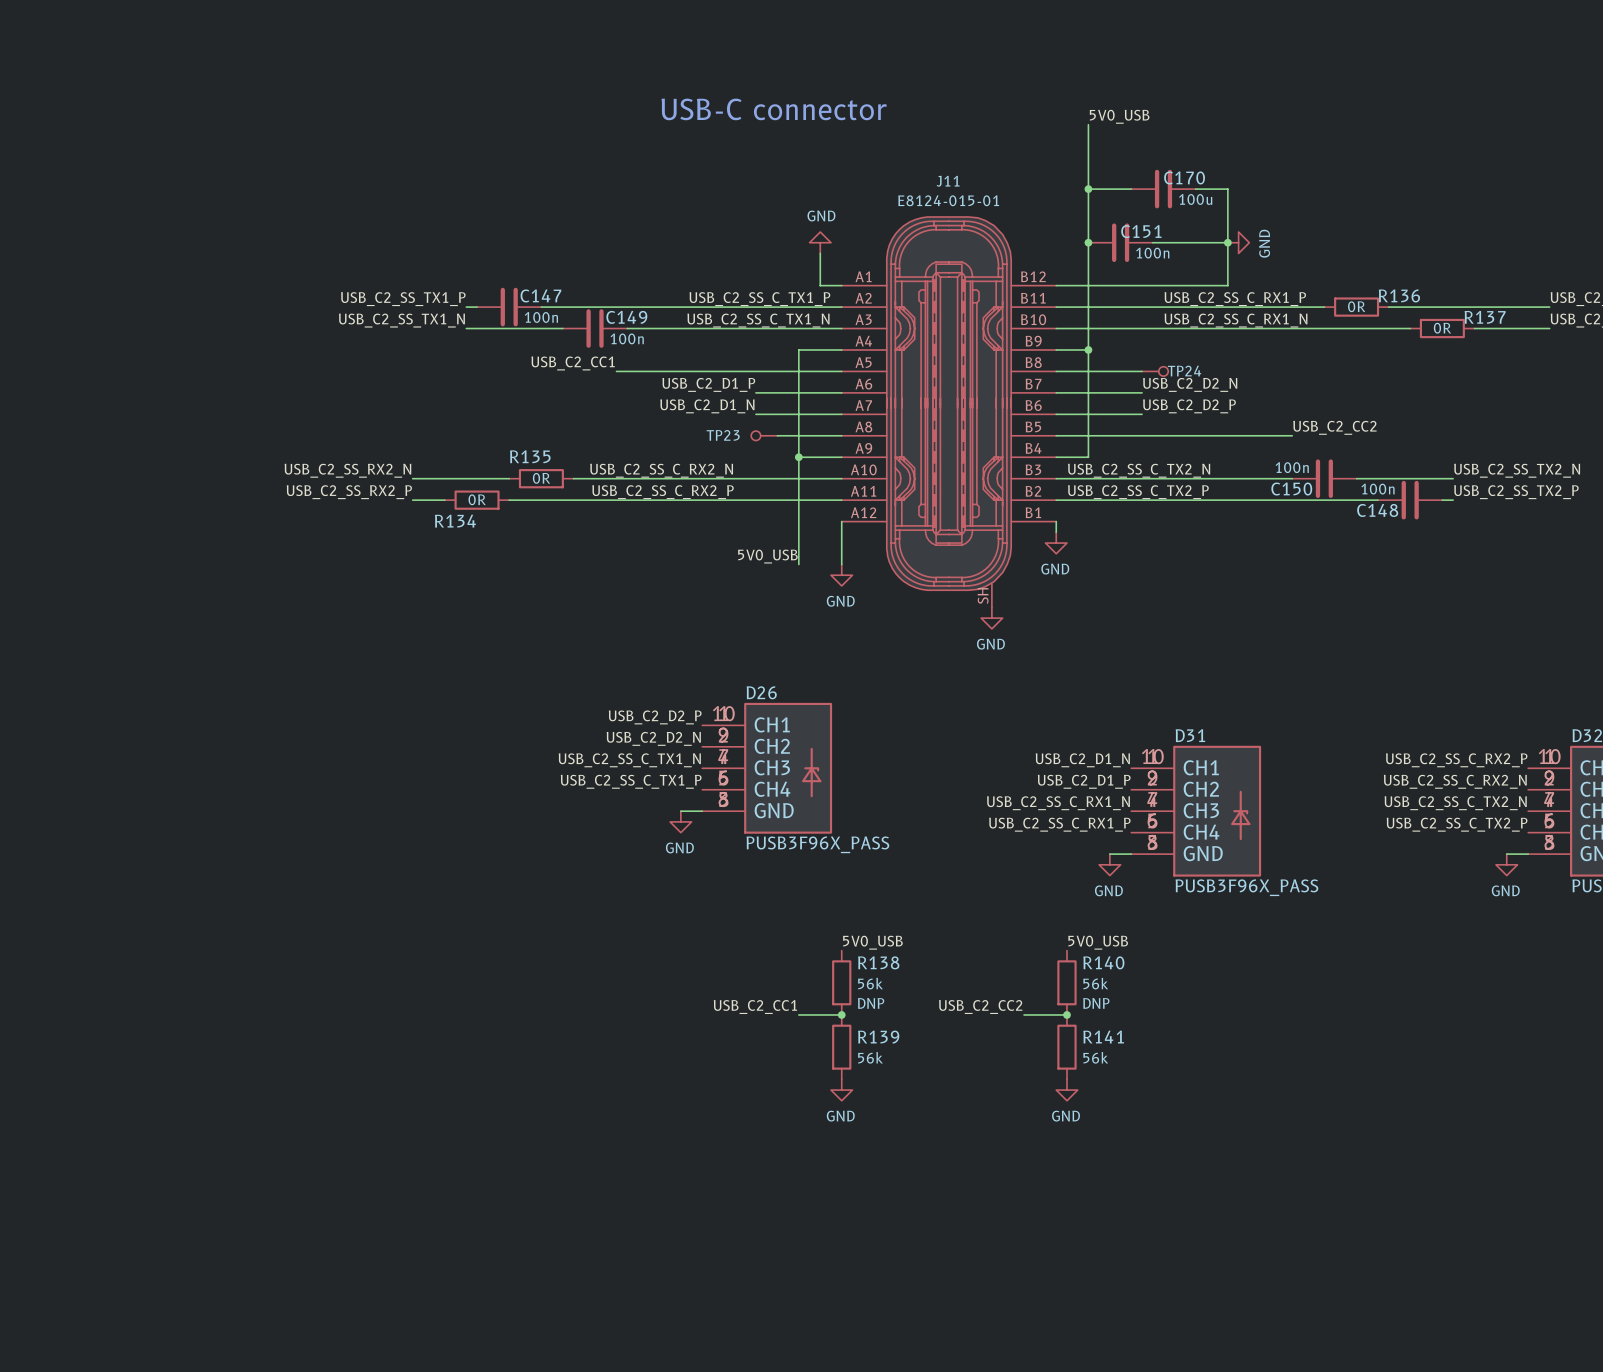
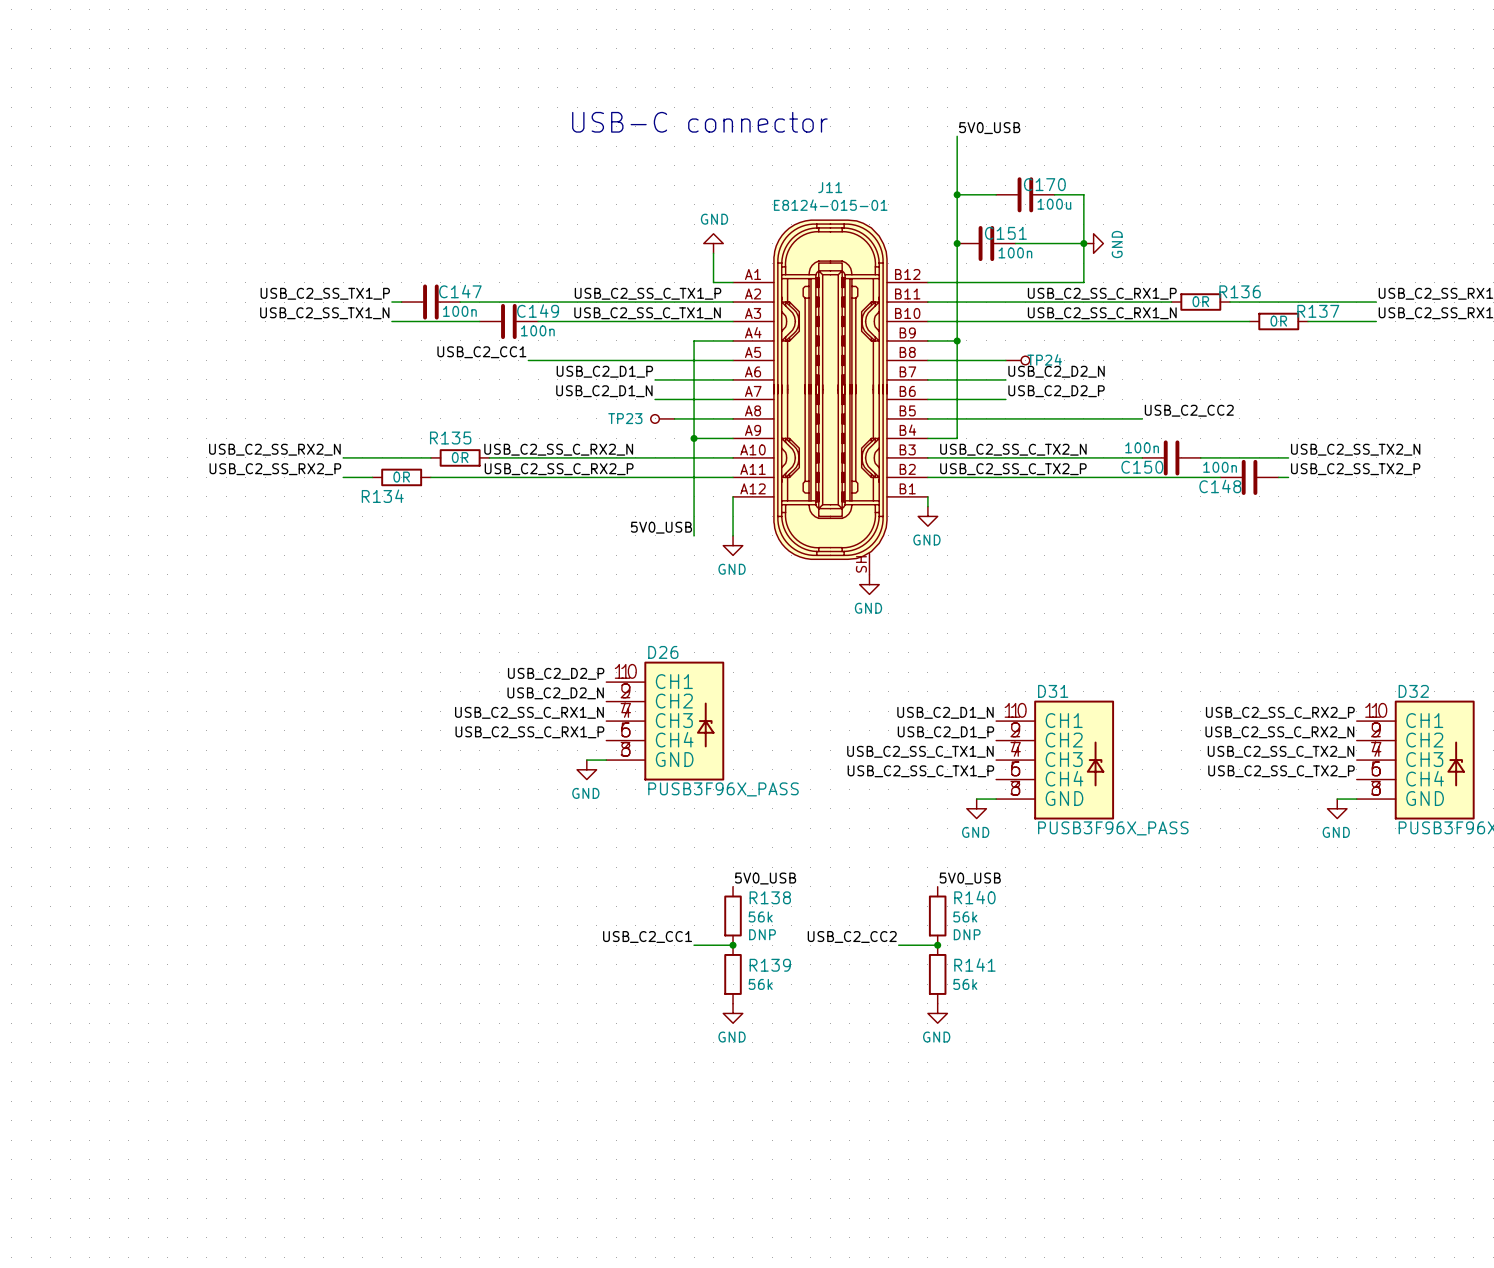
label: USB_C2_SS_C_TX1_N (629, 760) -> USB_C2_SS_C_RX1_N (529, 712)
label: USB_C2_SS_C_TX1_P (631, 781) -> USB_C2_SS_C_RX1_P (529, 732)
label: USB_C2_SS_C_RX1_N (1058, 803) -> USB_C2_SS_C_TX1_N (920, 751)
label: USB_C2_SS_C_RX1_P (1059, 824) -> USB_C2_SS_C_TX1_P (920, 771)

